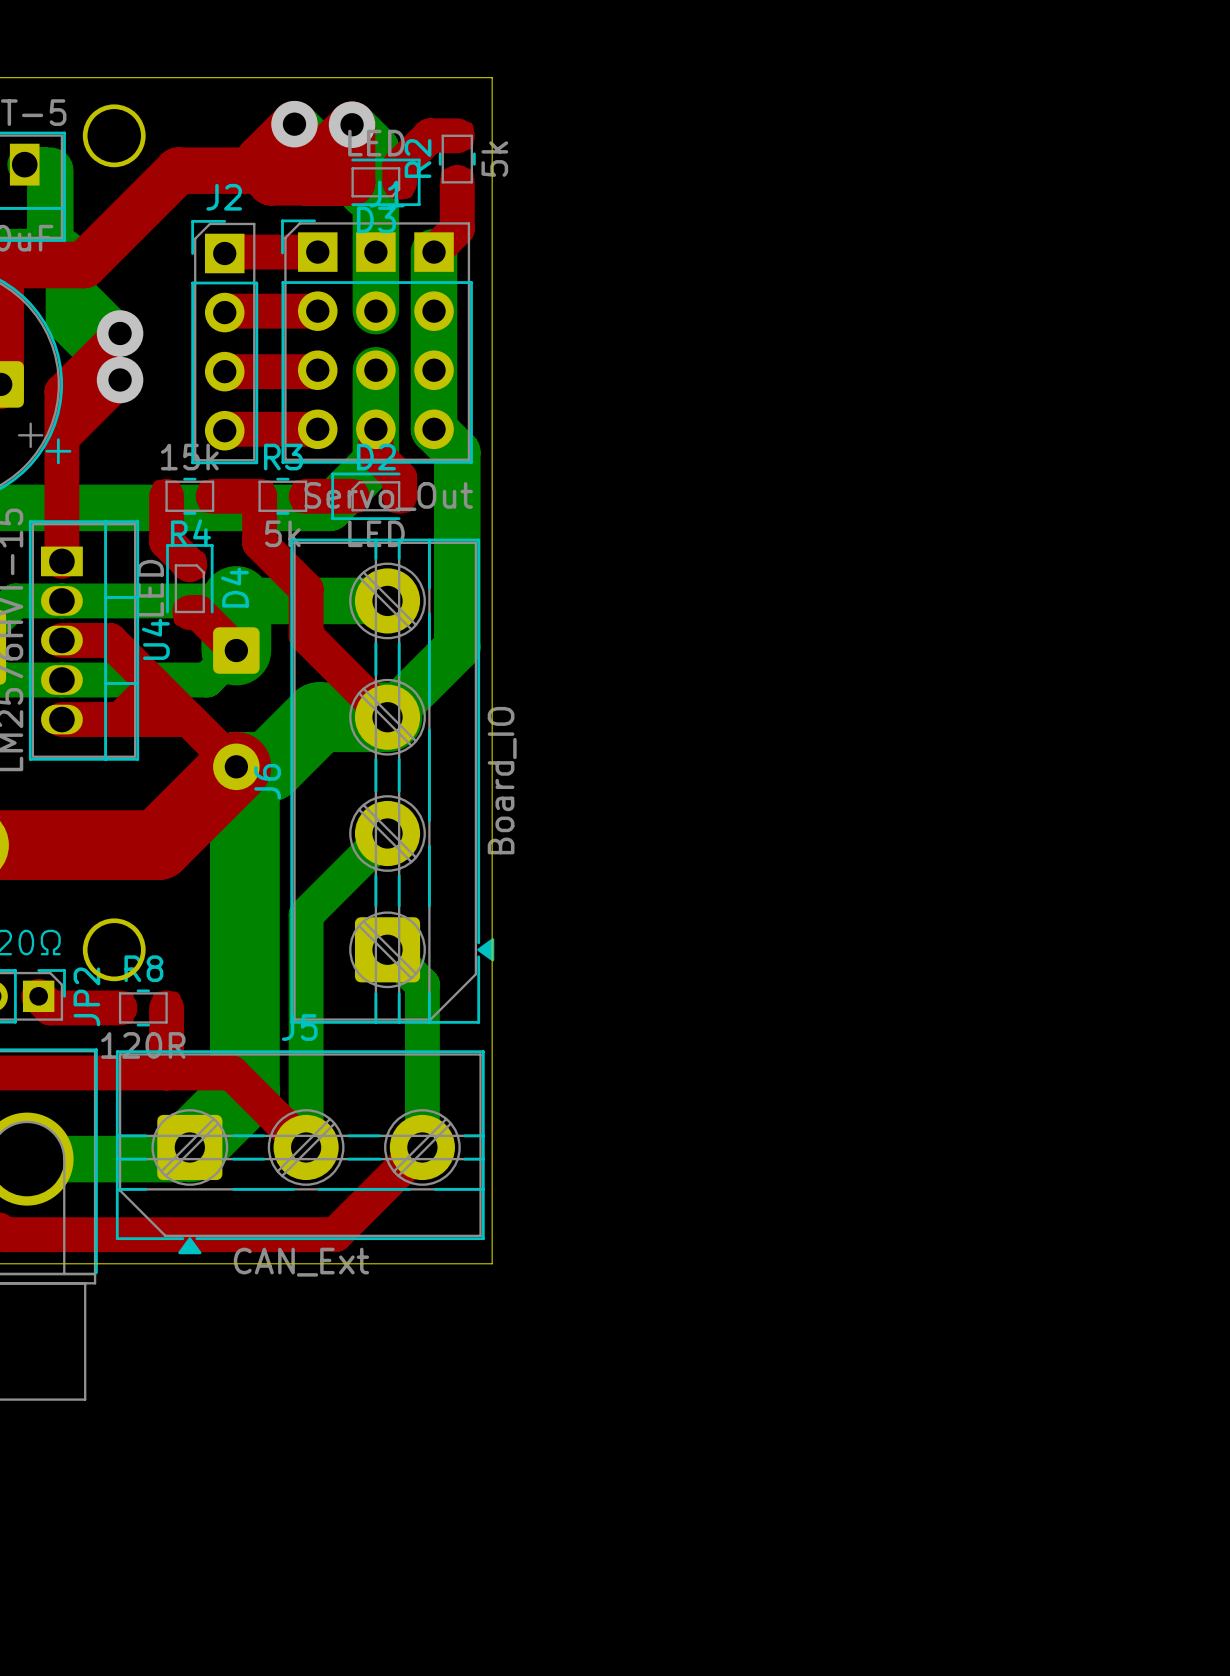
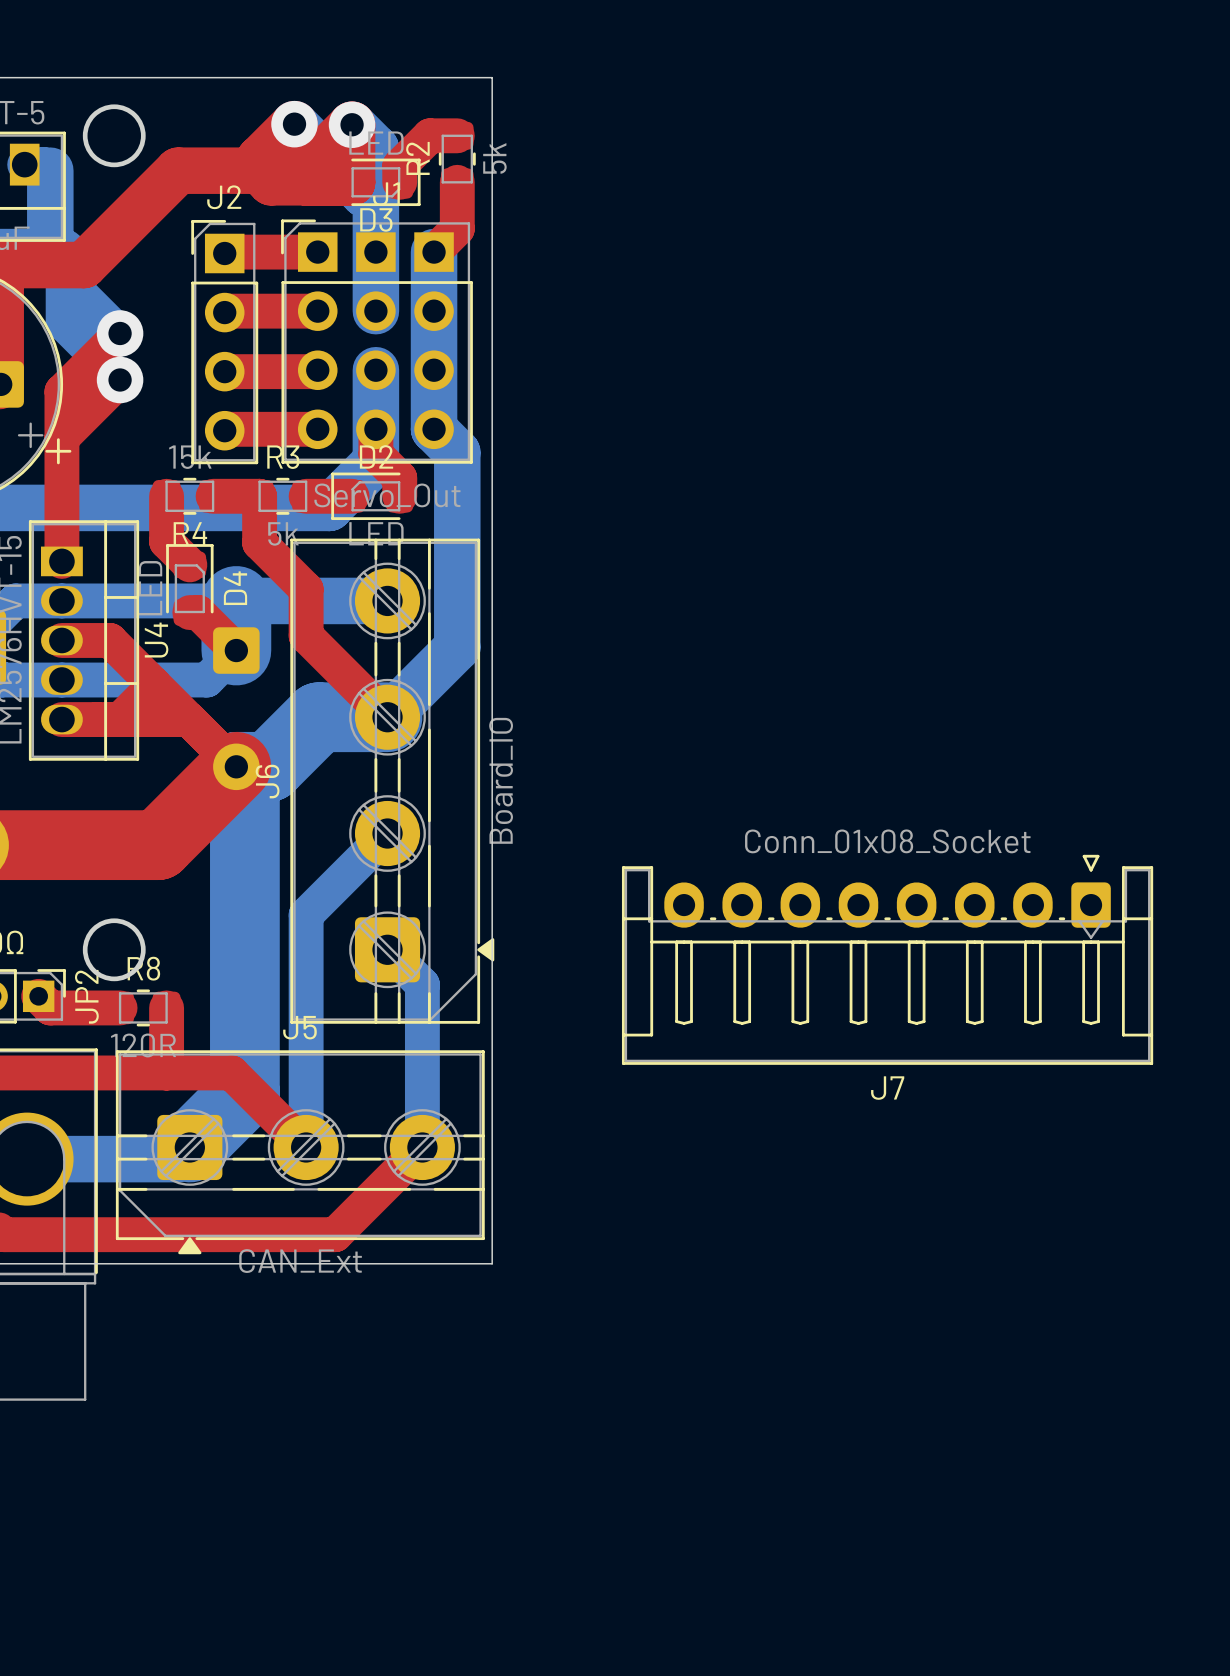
J7: none -> Conn_01x08_Socket (887, 959)

